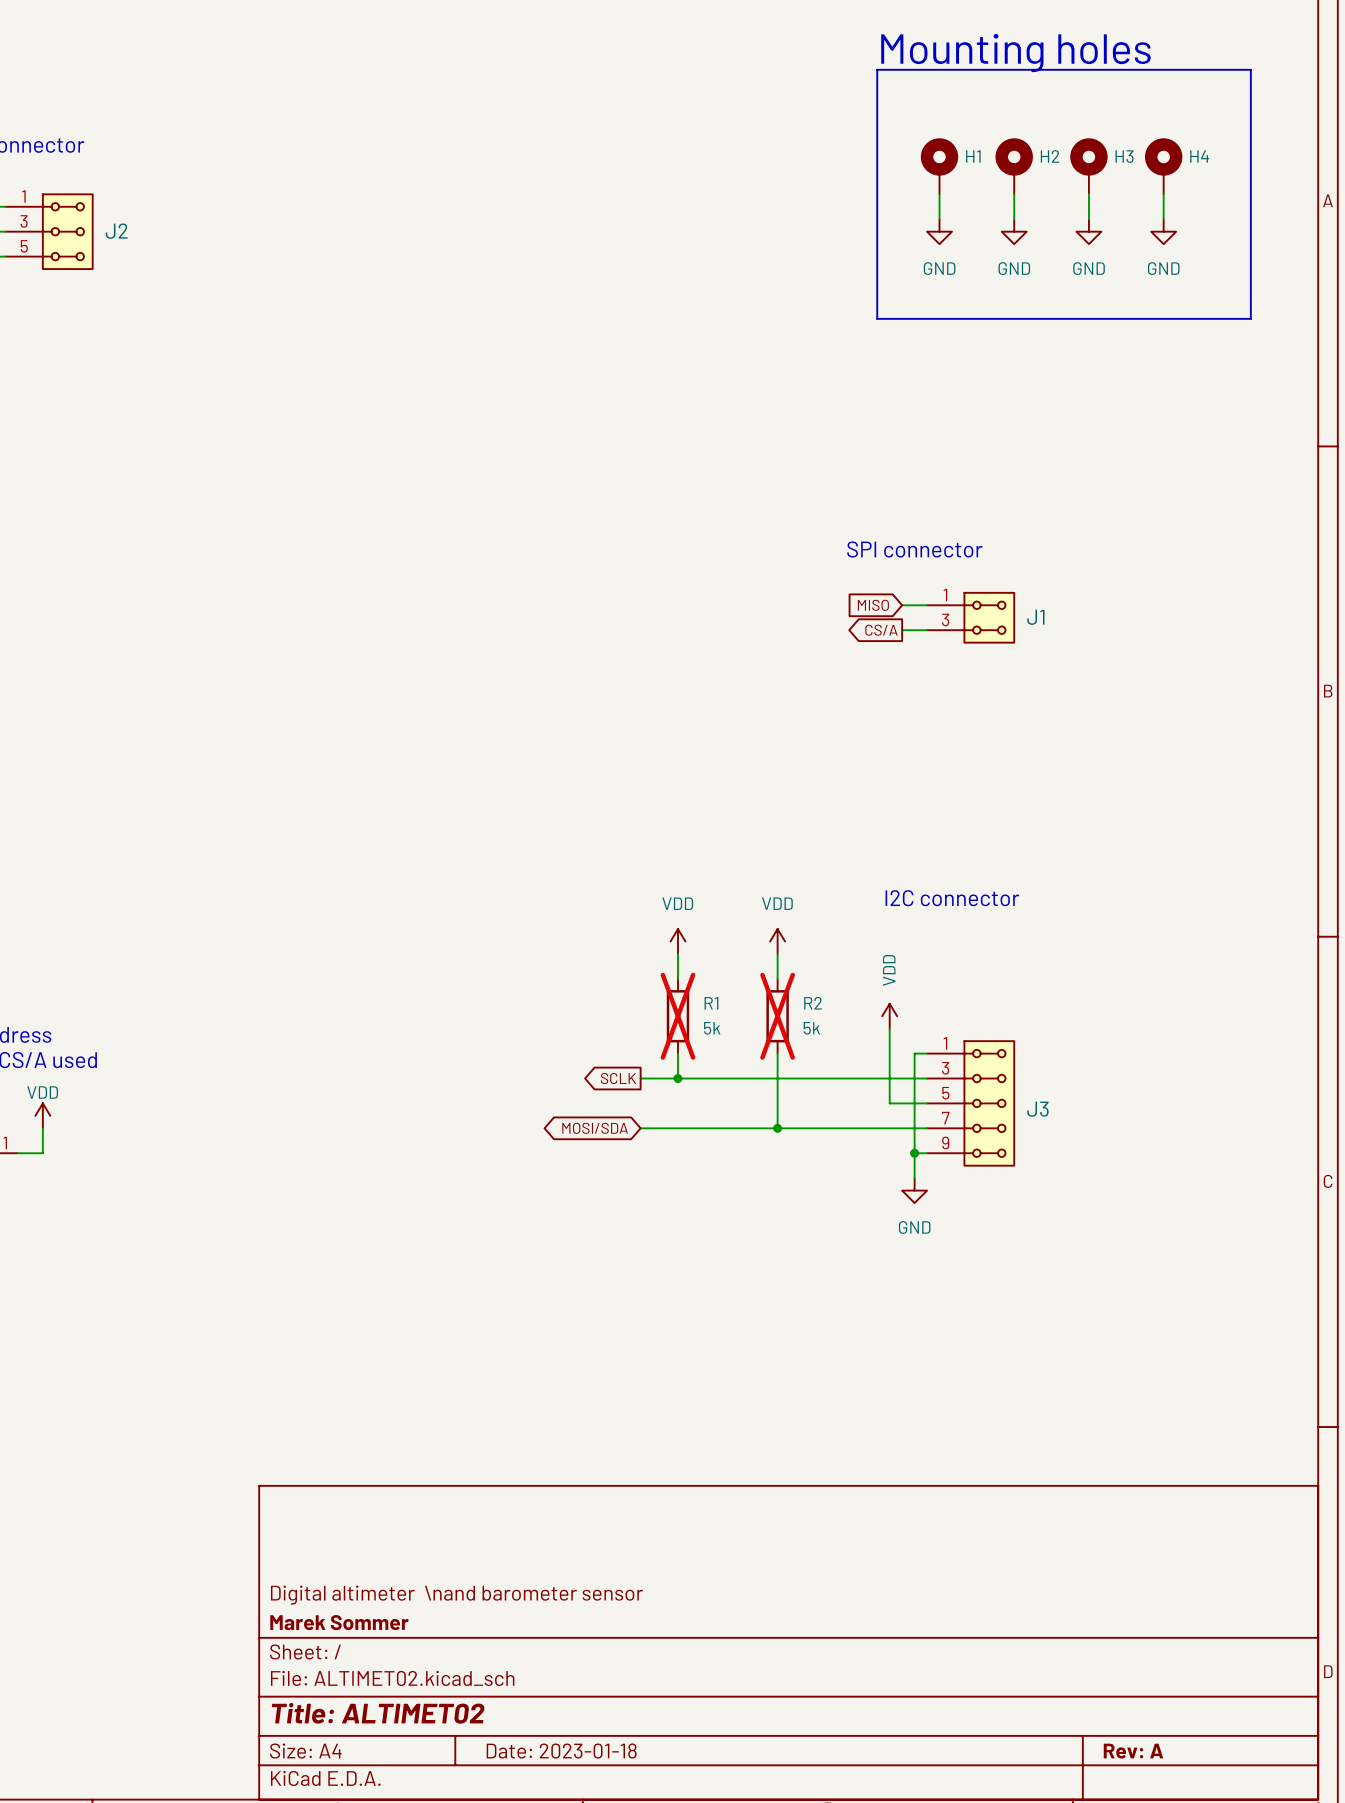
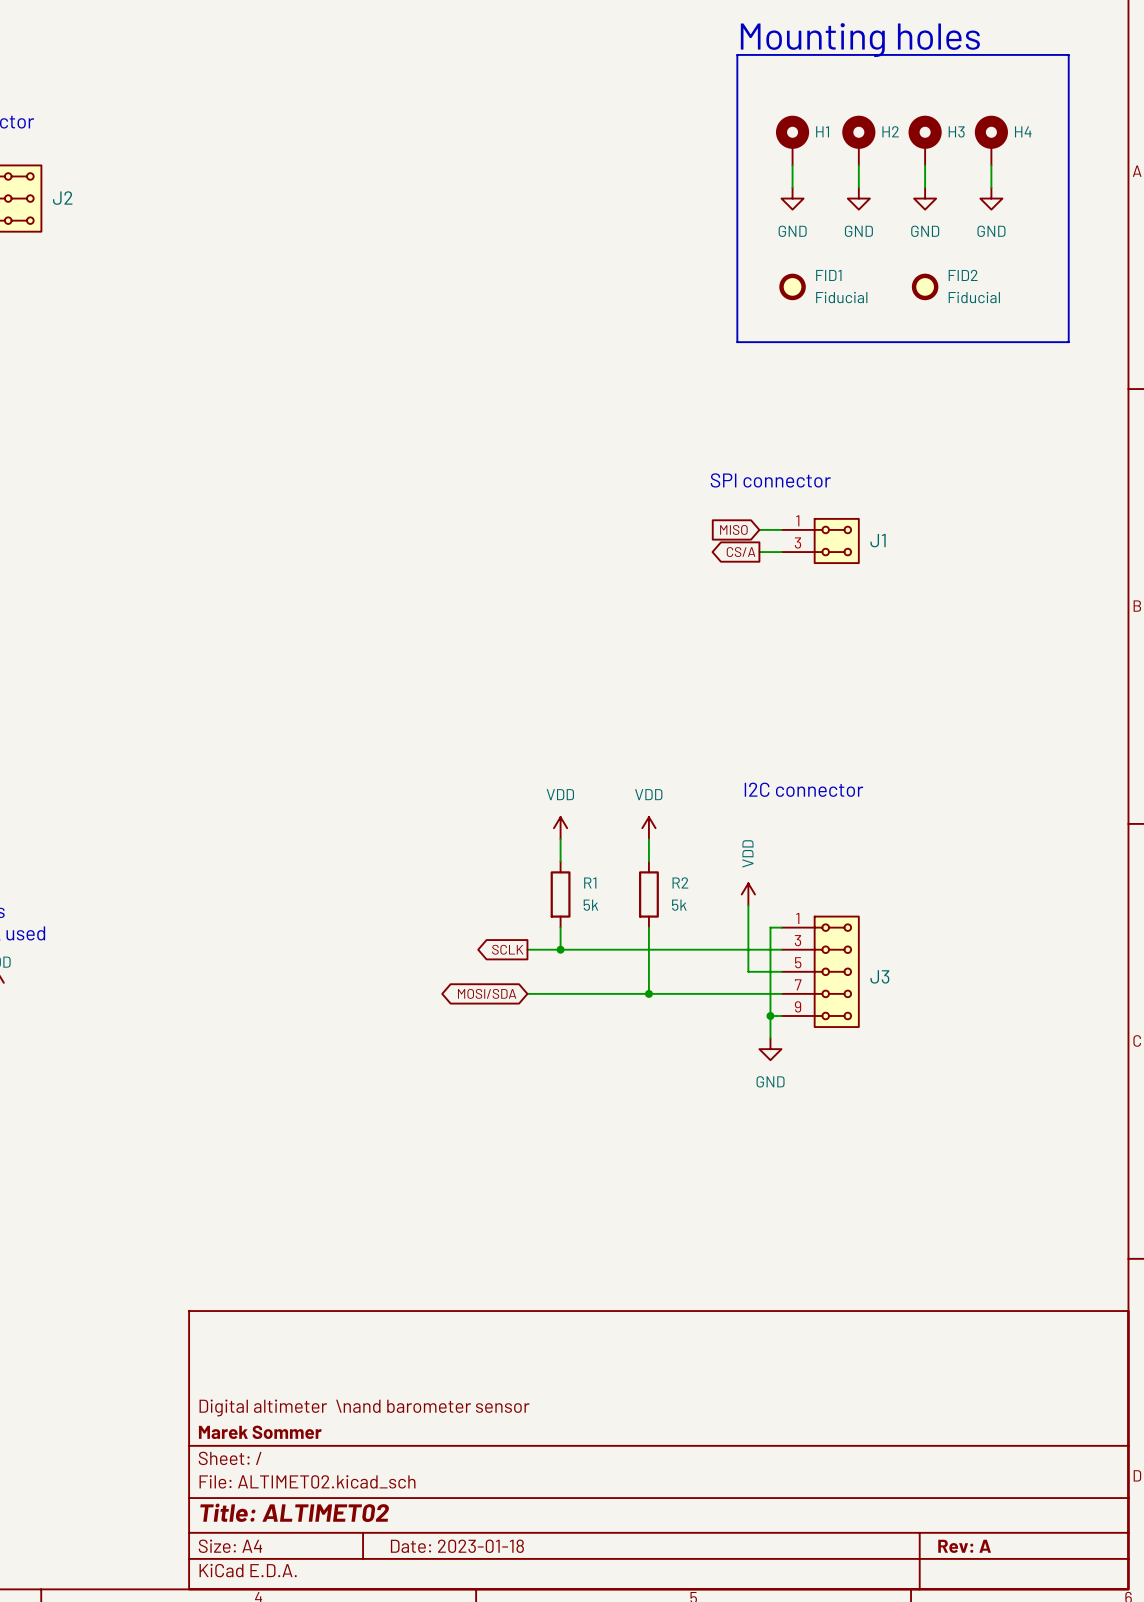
line: (877, 318) (1250, 318) -> (737, 275) (737, 342) (1068, 342) (1068, 275)
FID1: none -> Fiducial (792, 286)
FID2: none -> Fiducial (925, 286)
R1 do-not-place cross: (677, 1016) -> none
R2 do-not-place cross: (777, 1016) -> none

